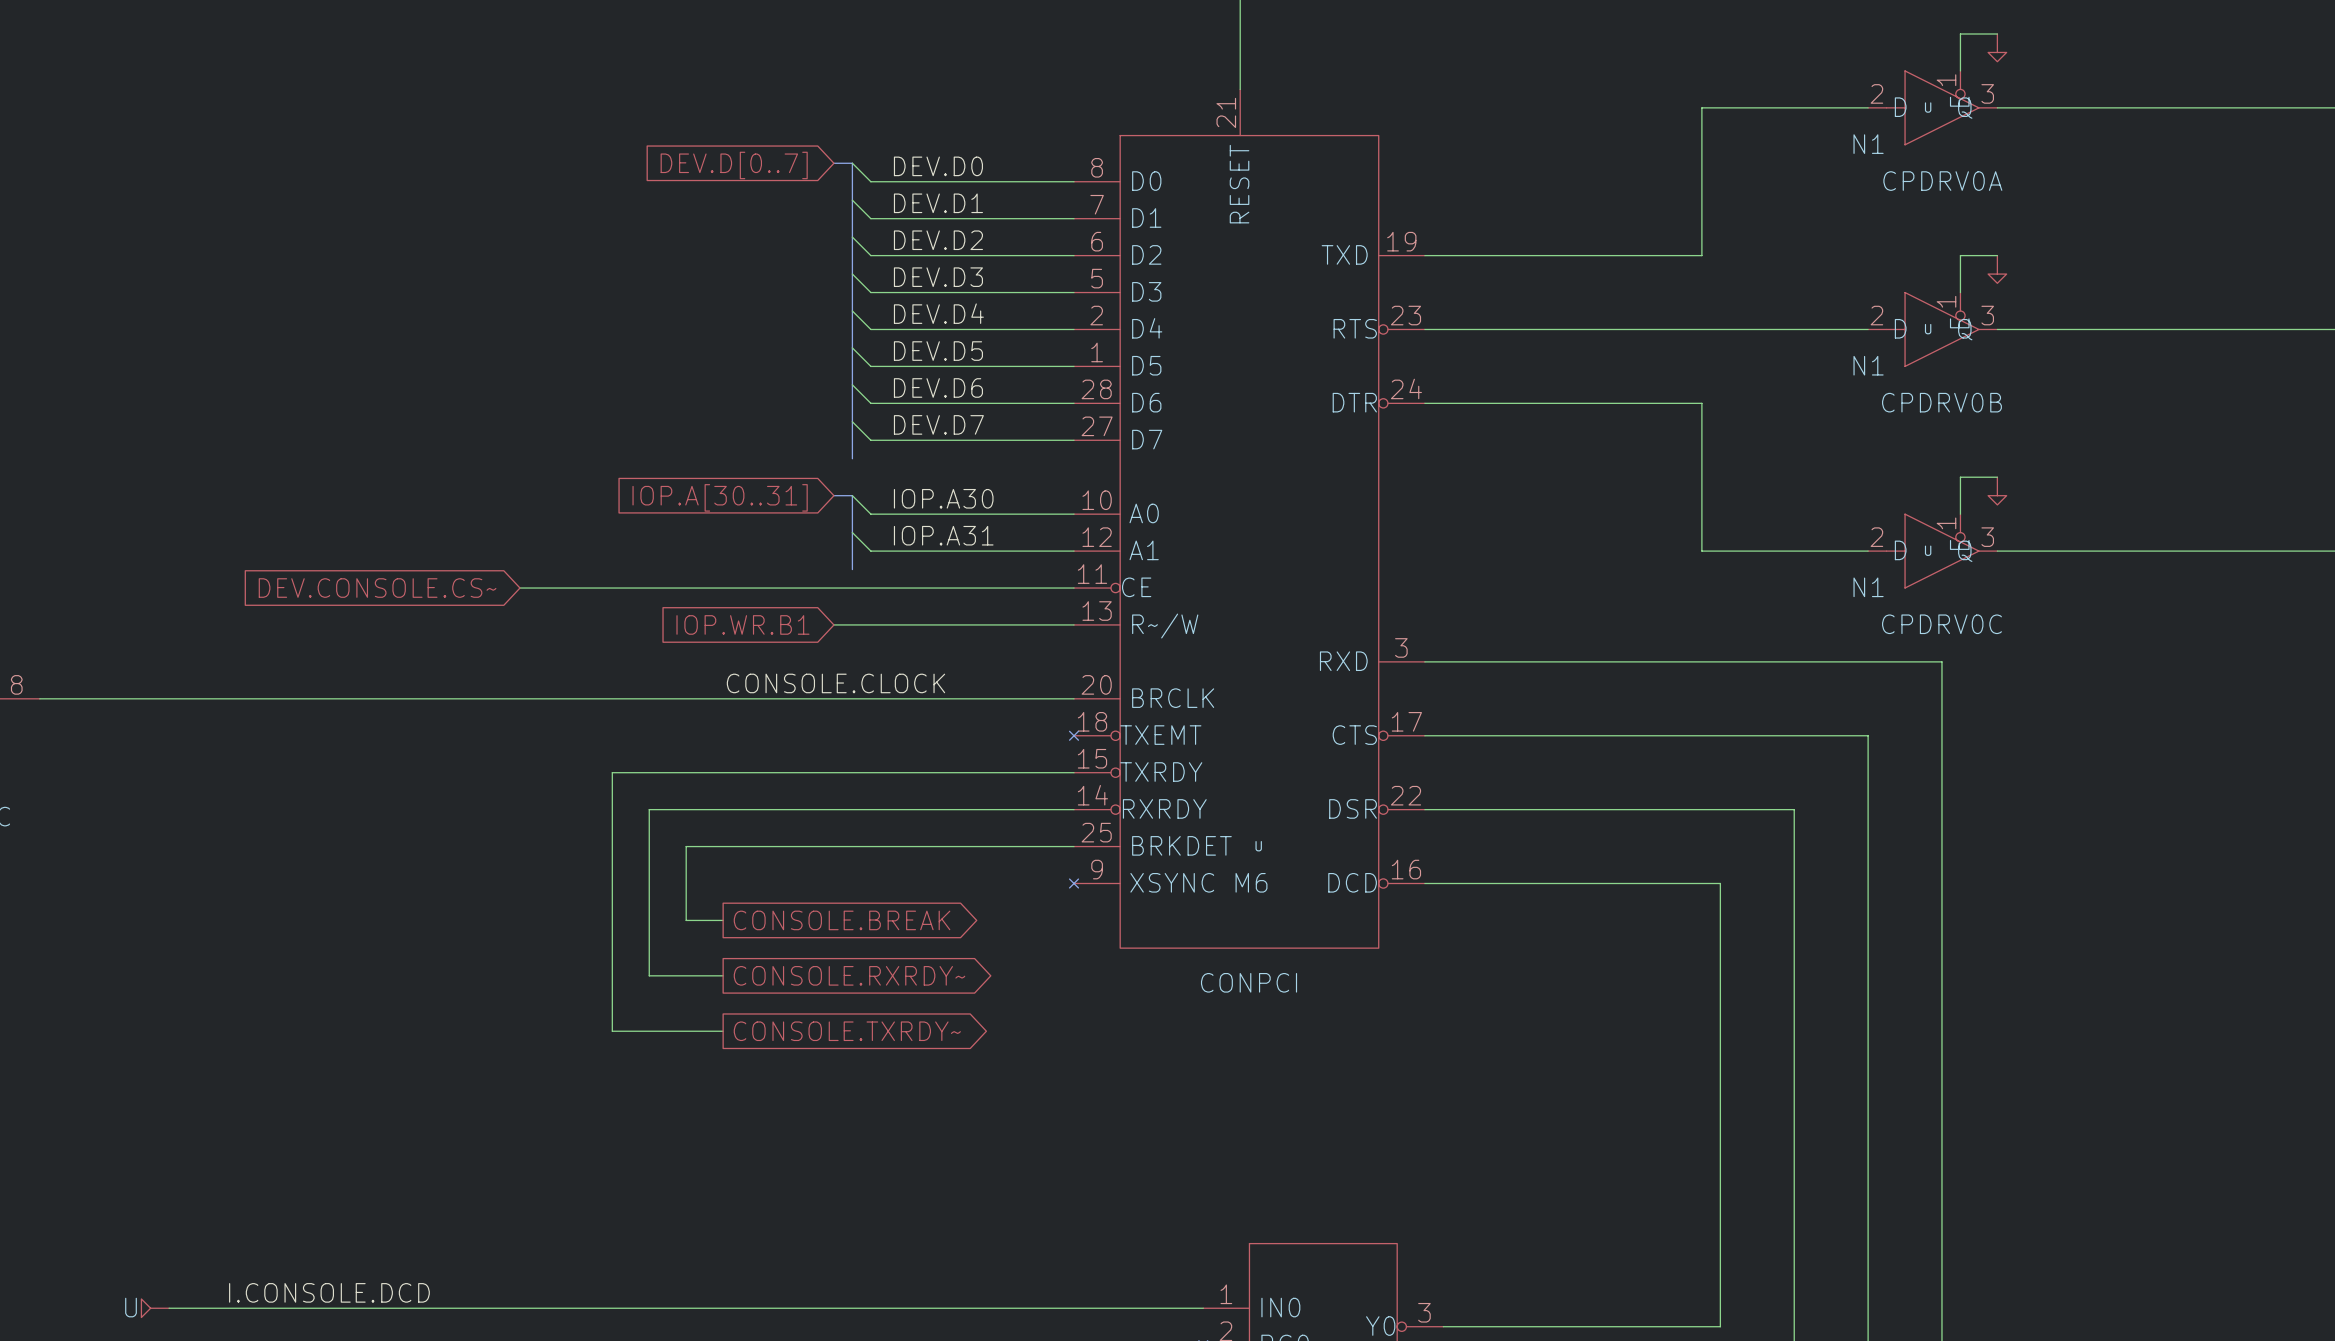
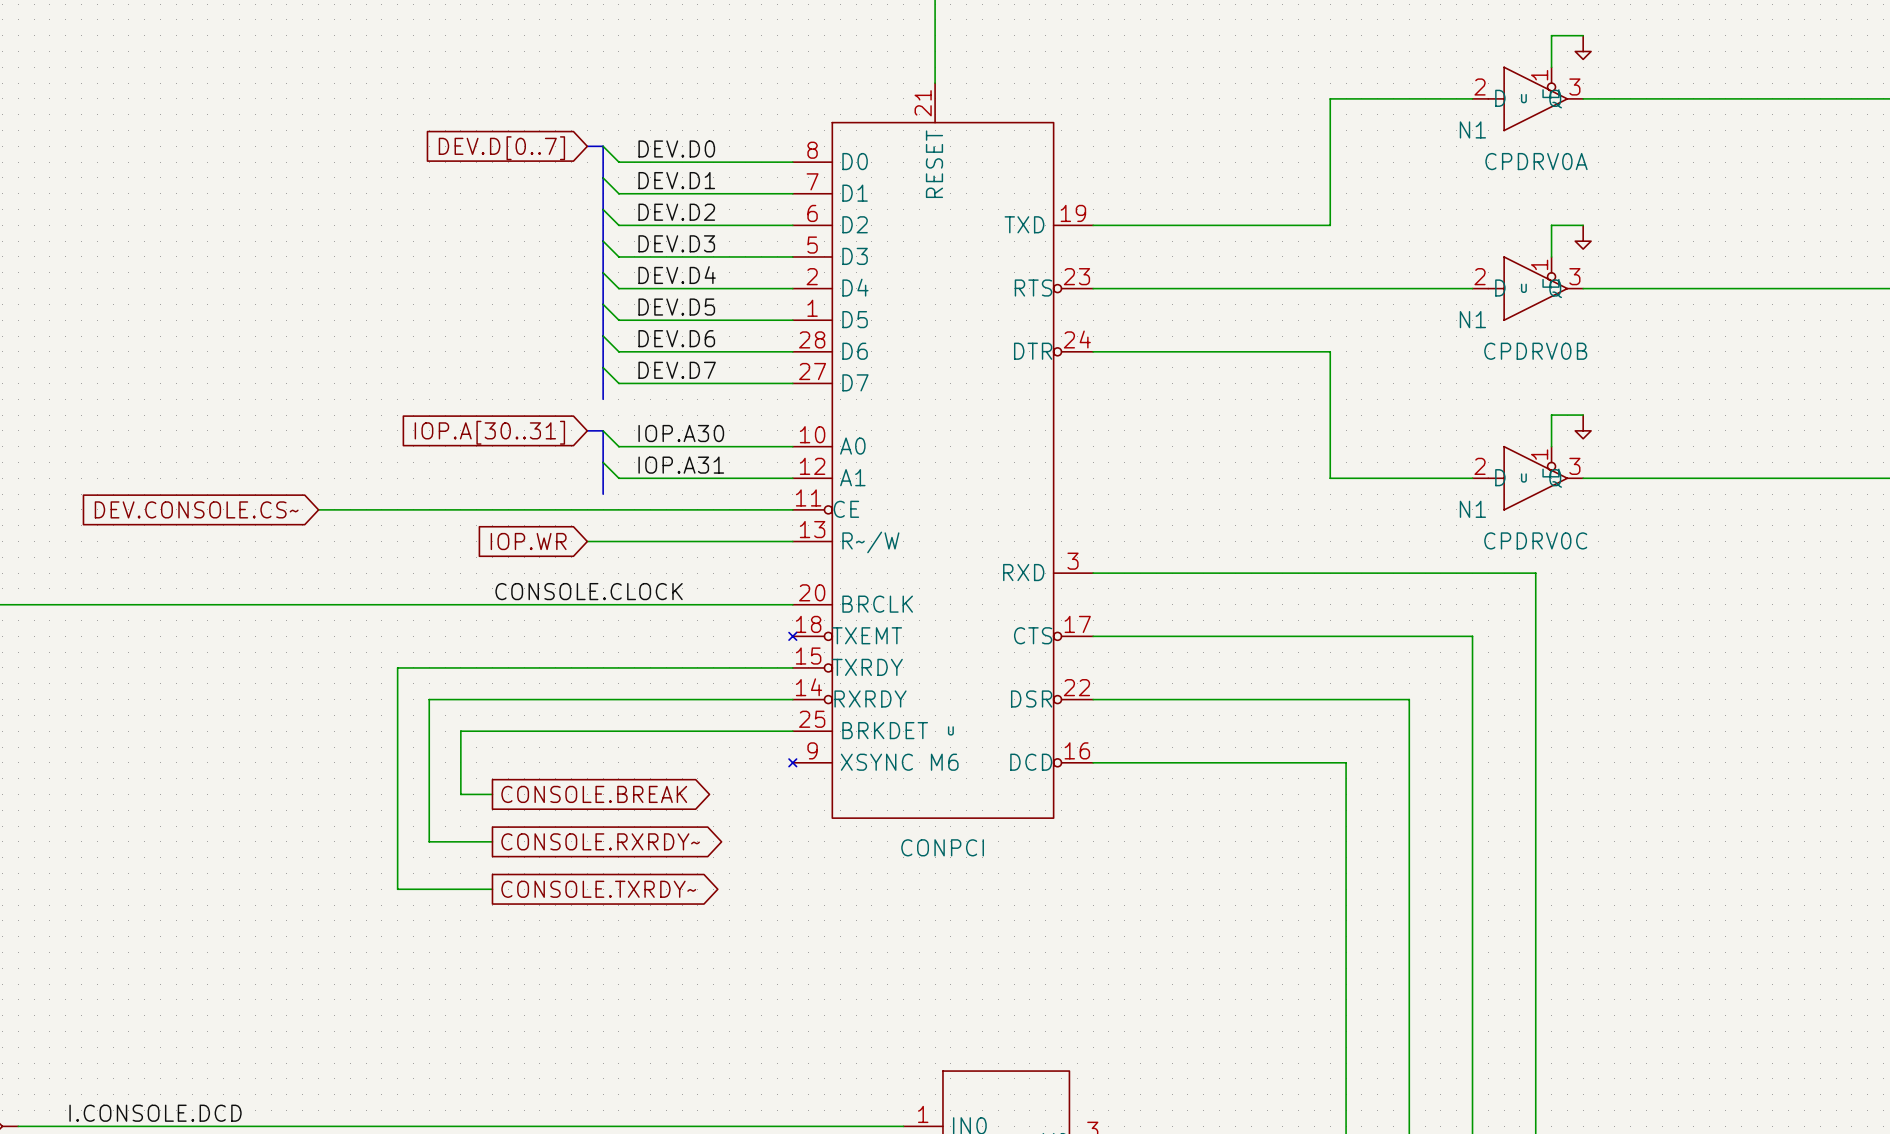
global label: IOP.WR.B1 (742, 624) -> IOP.WR (528, 541)

